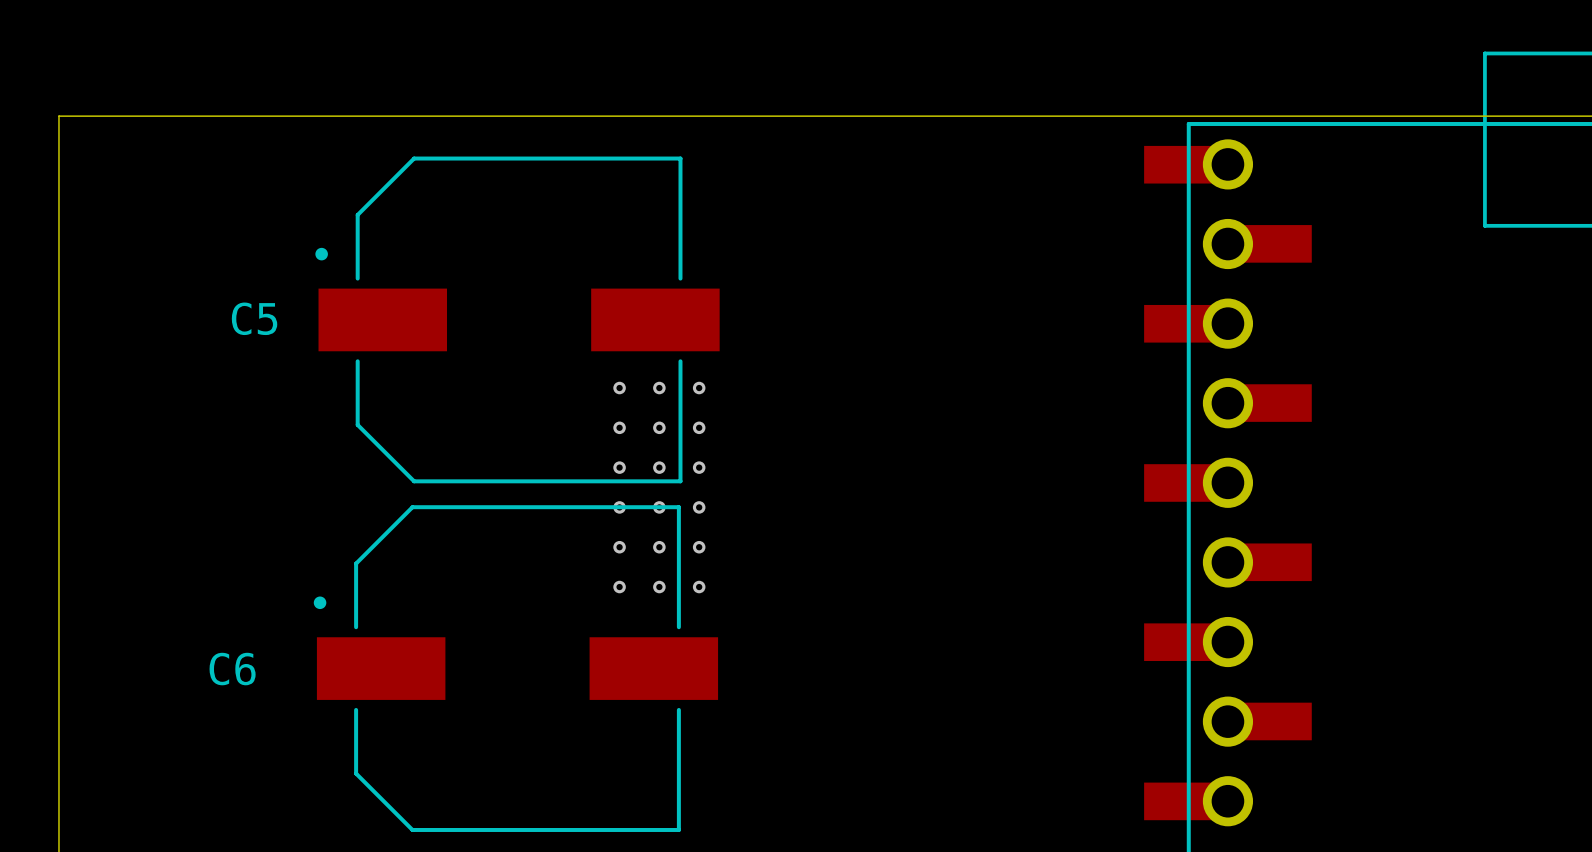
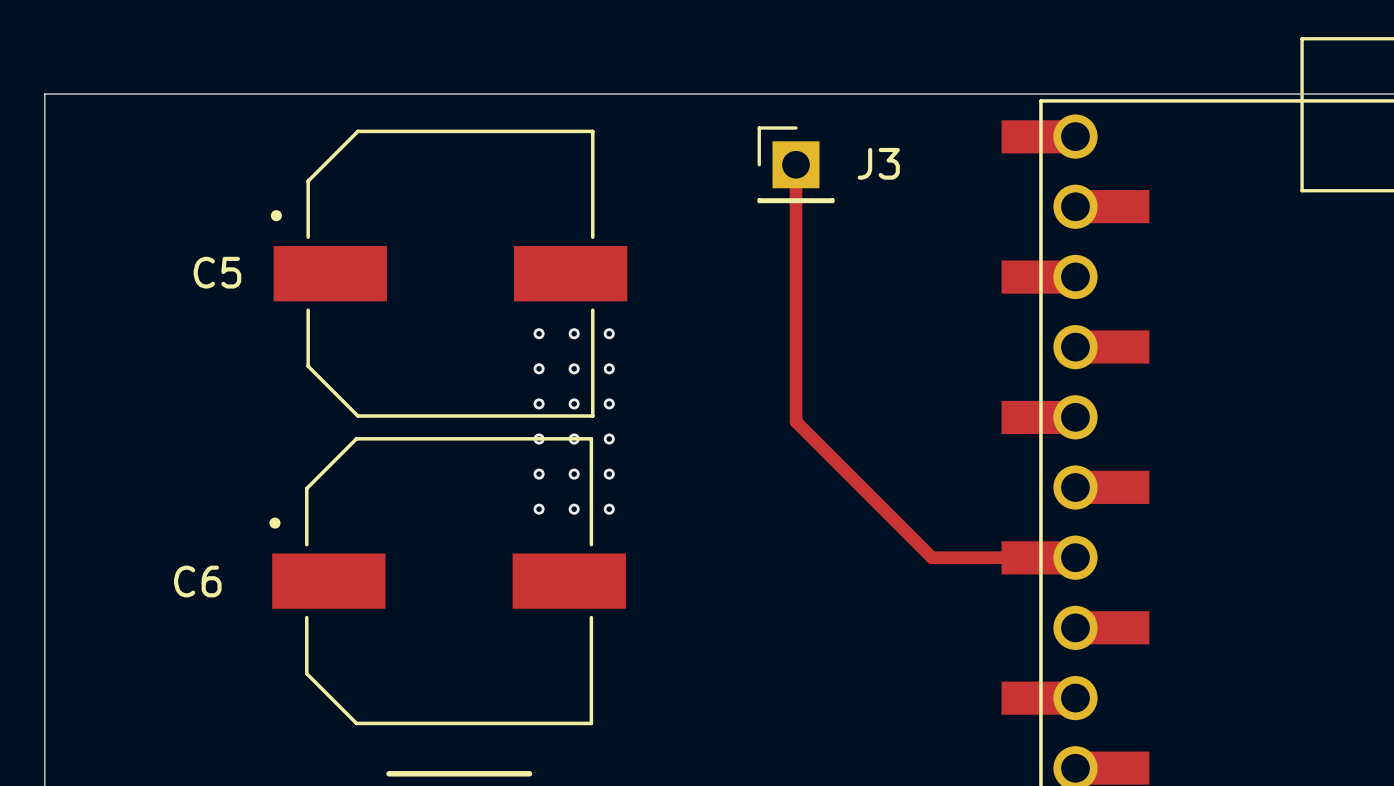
top track: none -> (796, 164) (796, 421) (931, 557) (1075, 557)
J3: none -> (796, 164)

